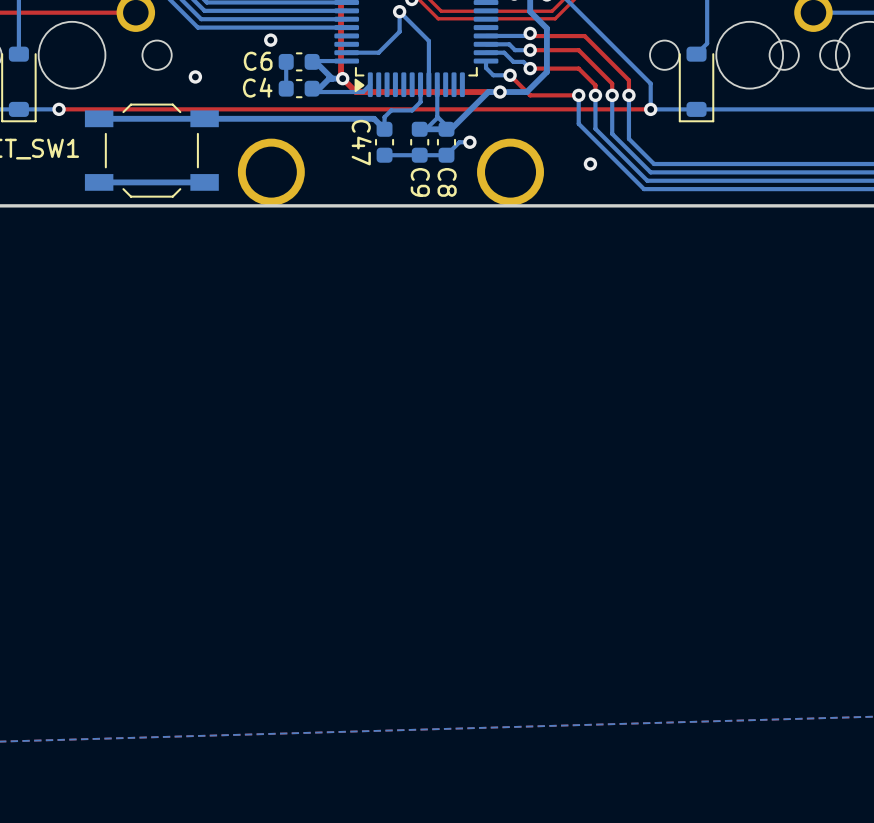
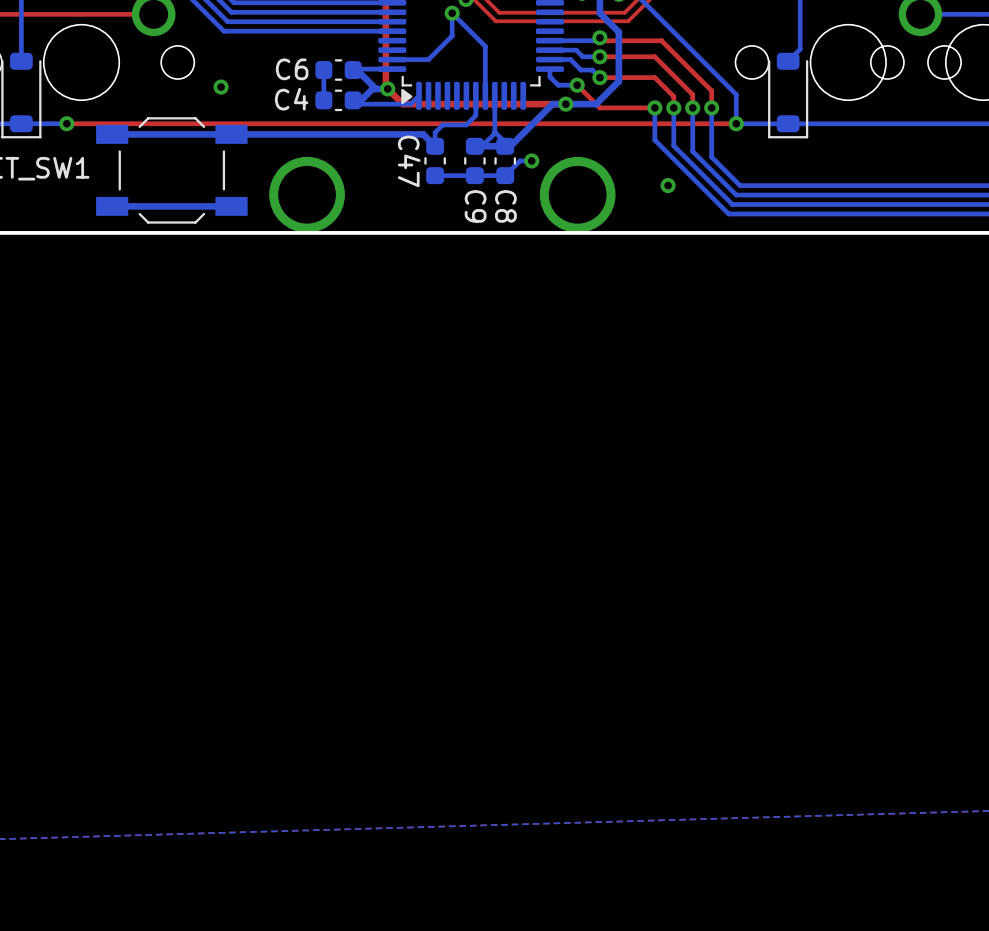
via: (270, 40) -> none

